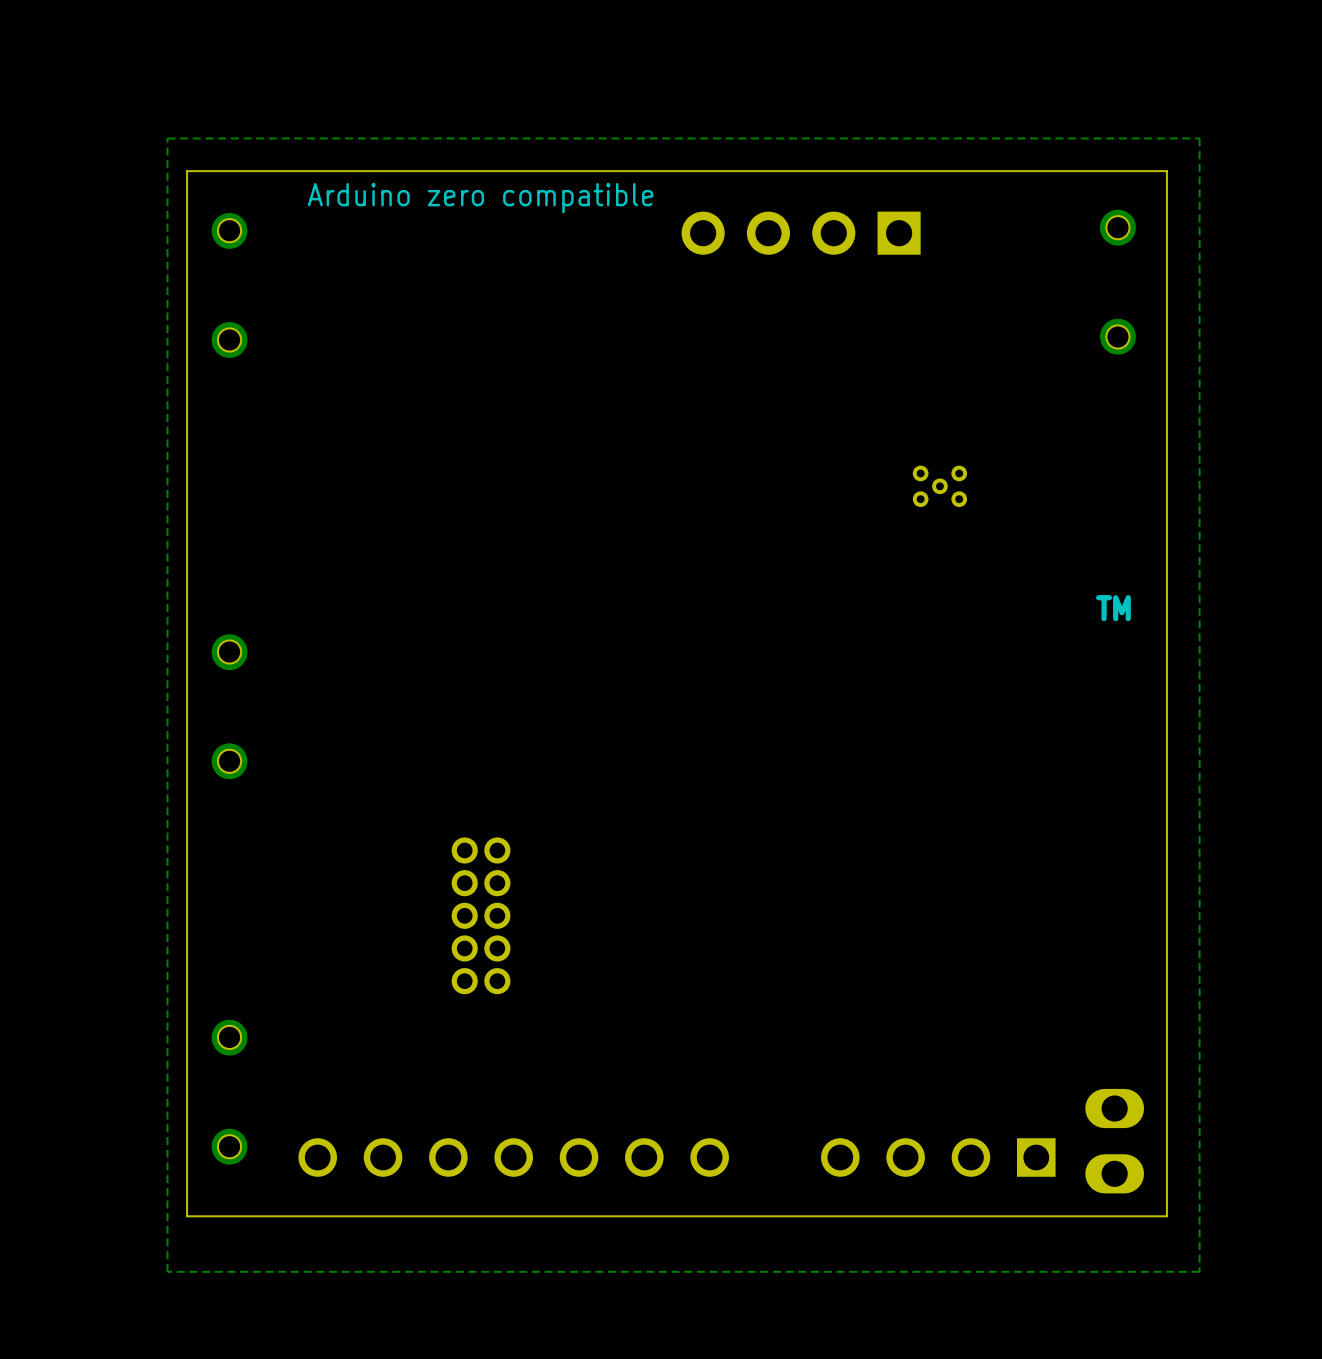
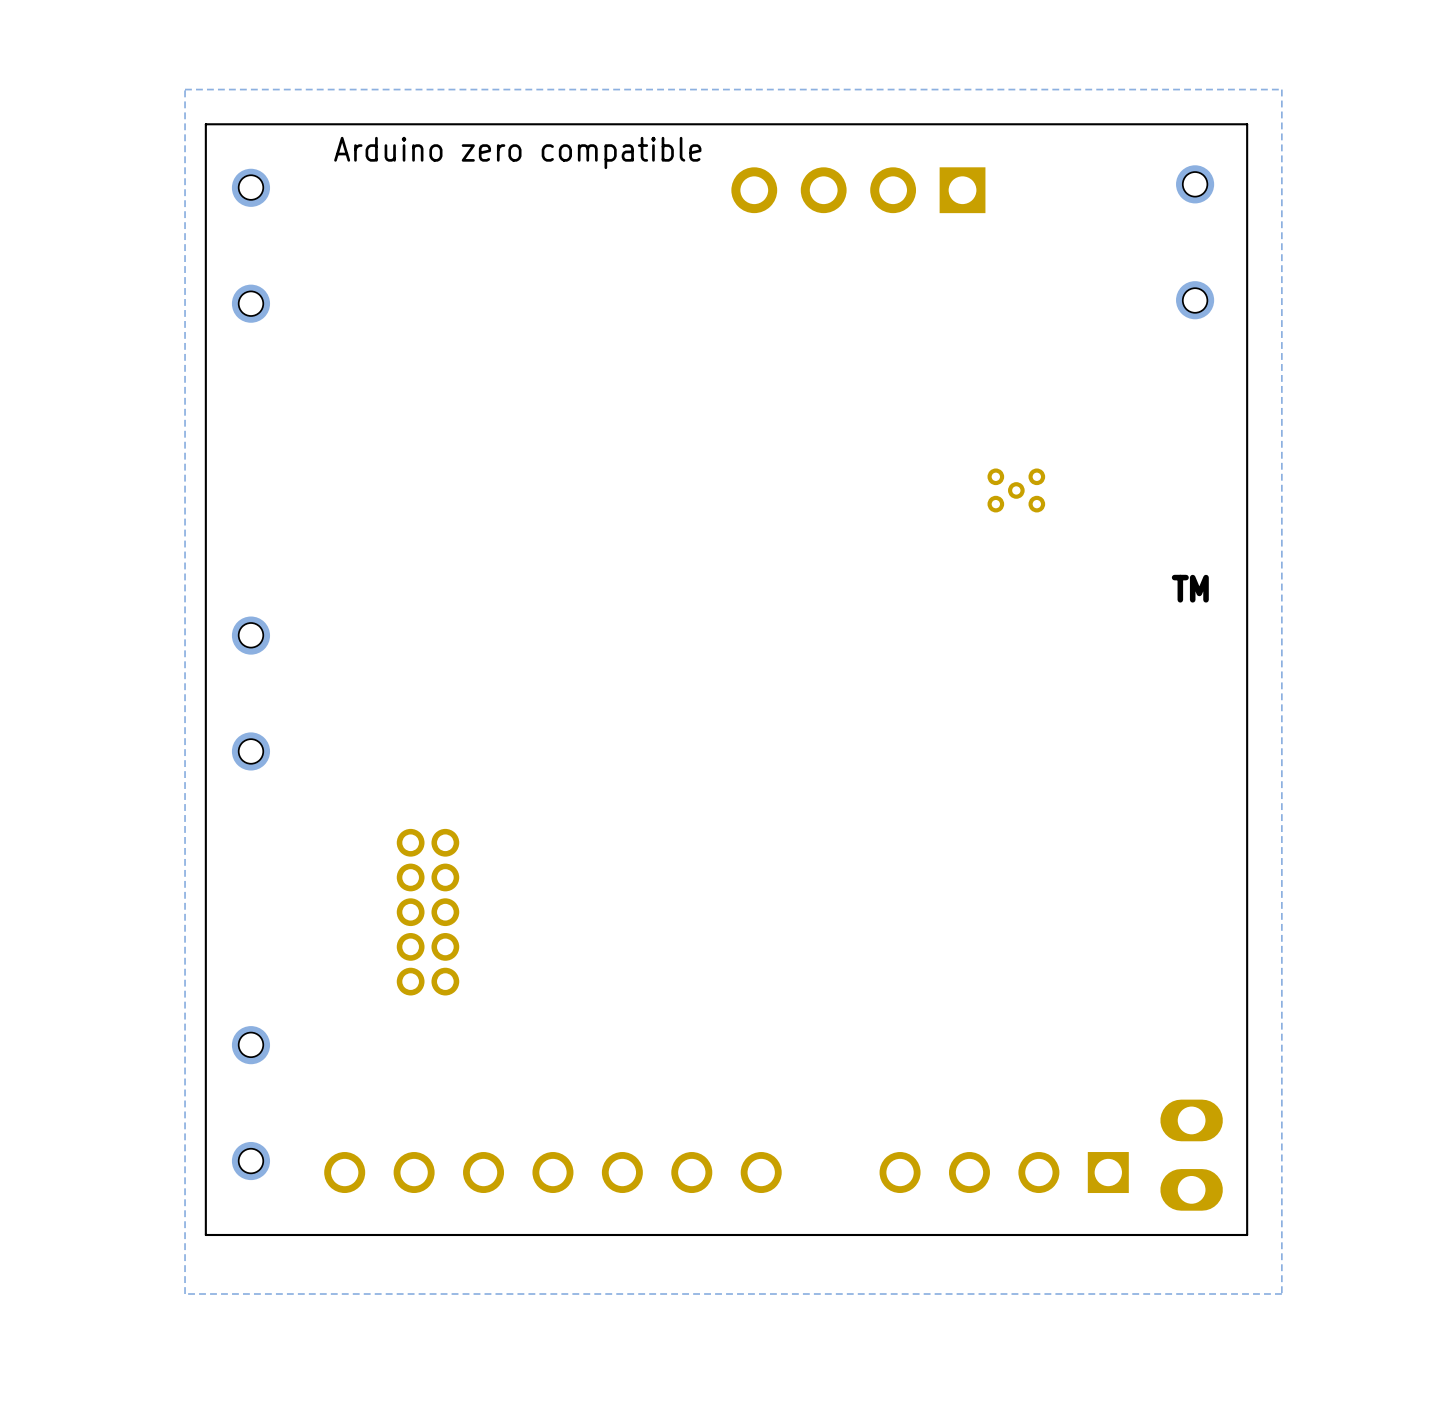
part position: (939, 486) -> (1016, 490)
part position: (481, 915) -> (427, 912)

